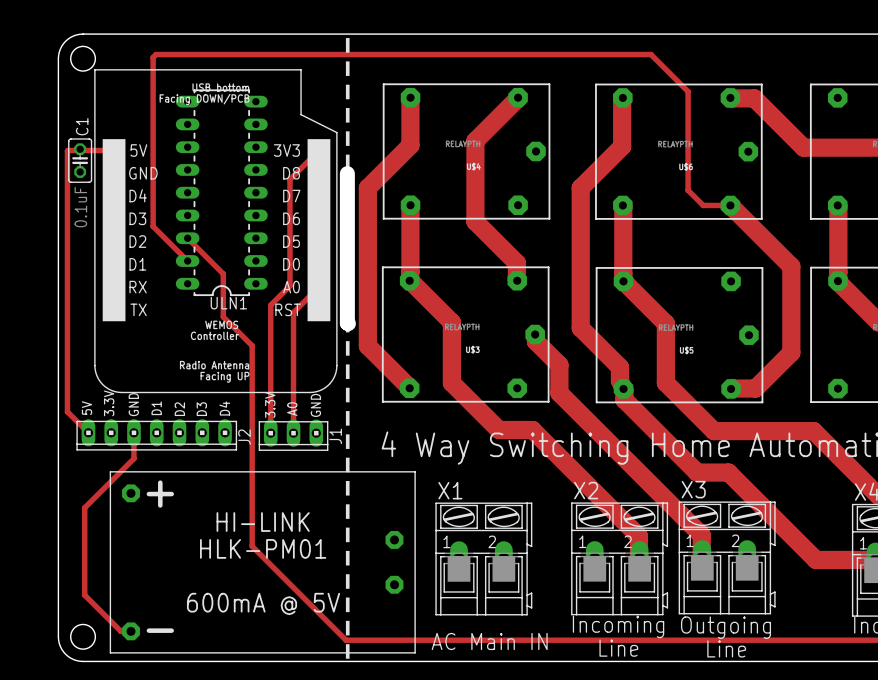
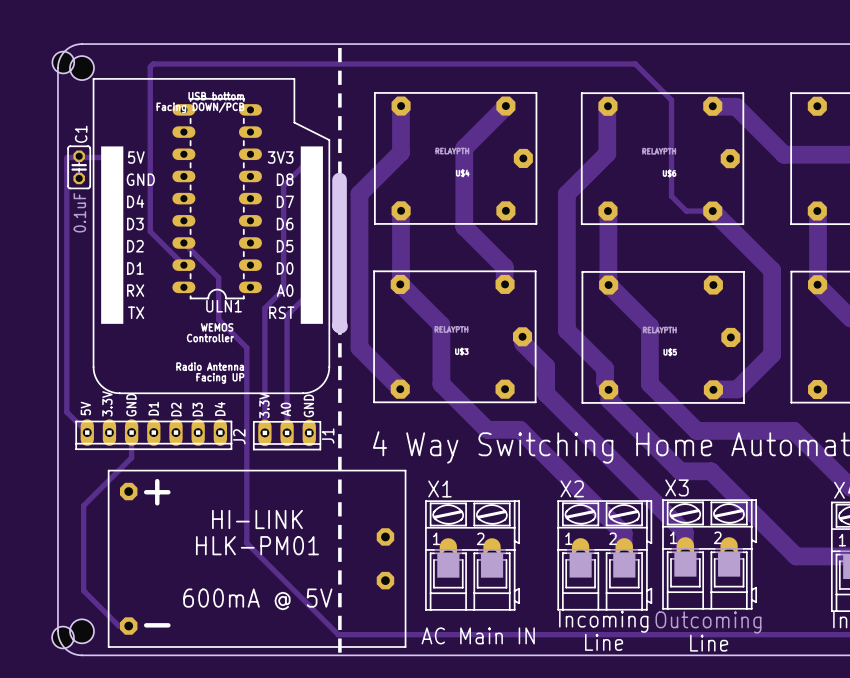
hole: none -> (63, 62)
text: Outgoing (726, 627) -> Outcoming (708, 622)
hole: none -> (63, 637)

